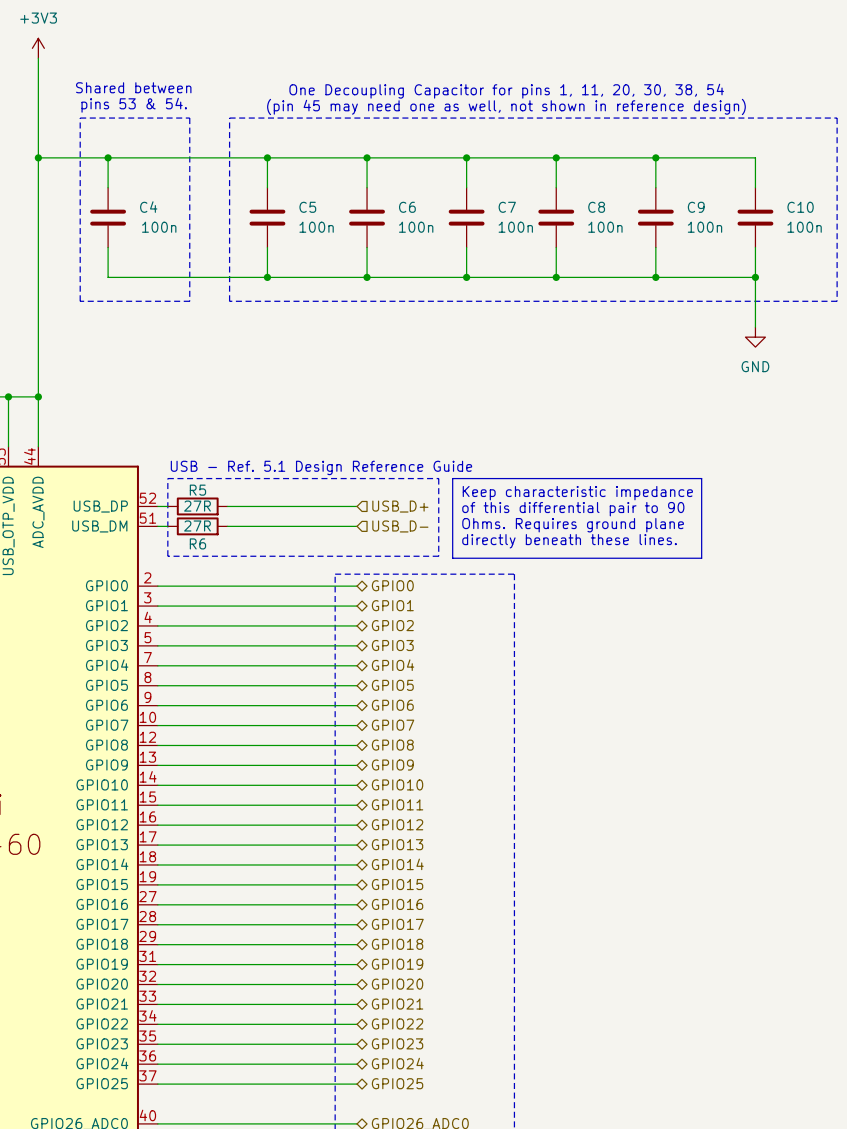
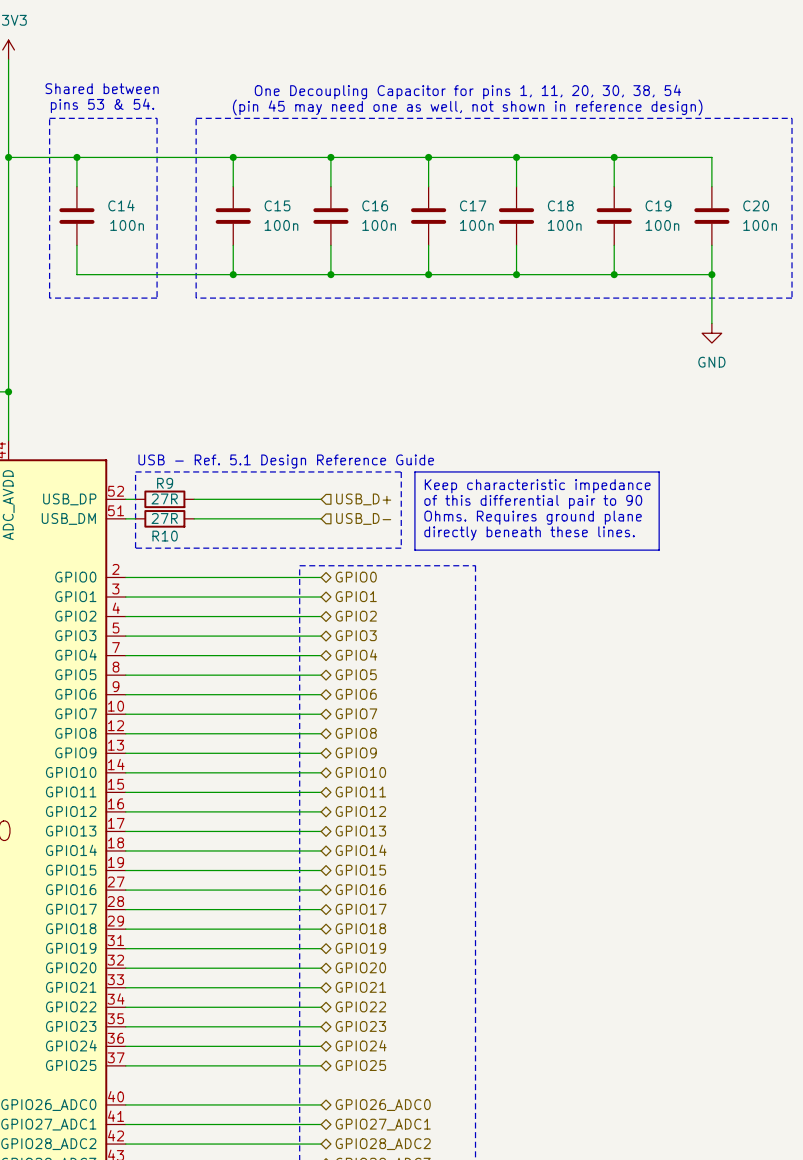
C4 name: C4 (148, 207) -> C14 (121, 205)
C5 name: C5 (307, 207) -> C15 (277, 205)
C6 name: C6 (407, 207) -> C16 (375, 205)
C7 name: C7 (507, 207) -> C17 (473, 205)
C8 name: C8 (596, 207) -> C18 (560, 205)
C9 name: C9 (696, 207) -> C19 (658, 205)
C10 name: C10 (800, 207) -> C20 (756, 205)
R5 name: R5 (197, 490) -> R9 (165, 483)
R6 name: R6 (197, 543) -> R10 (165, 536)

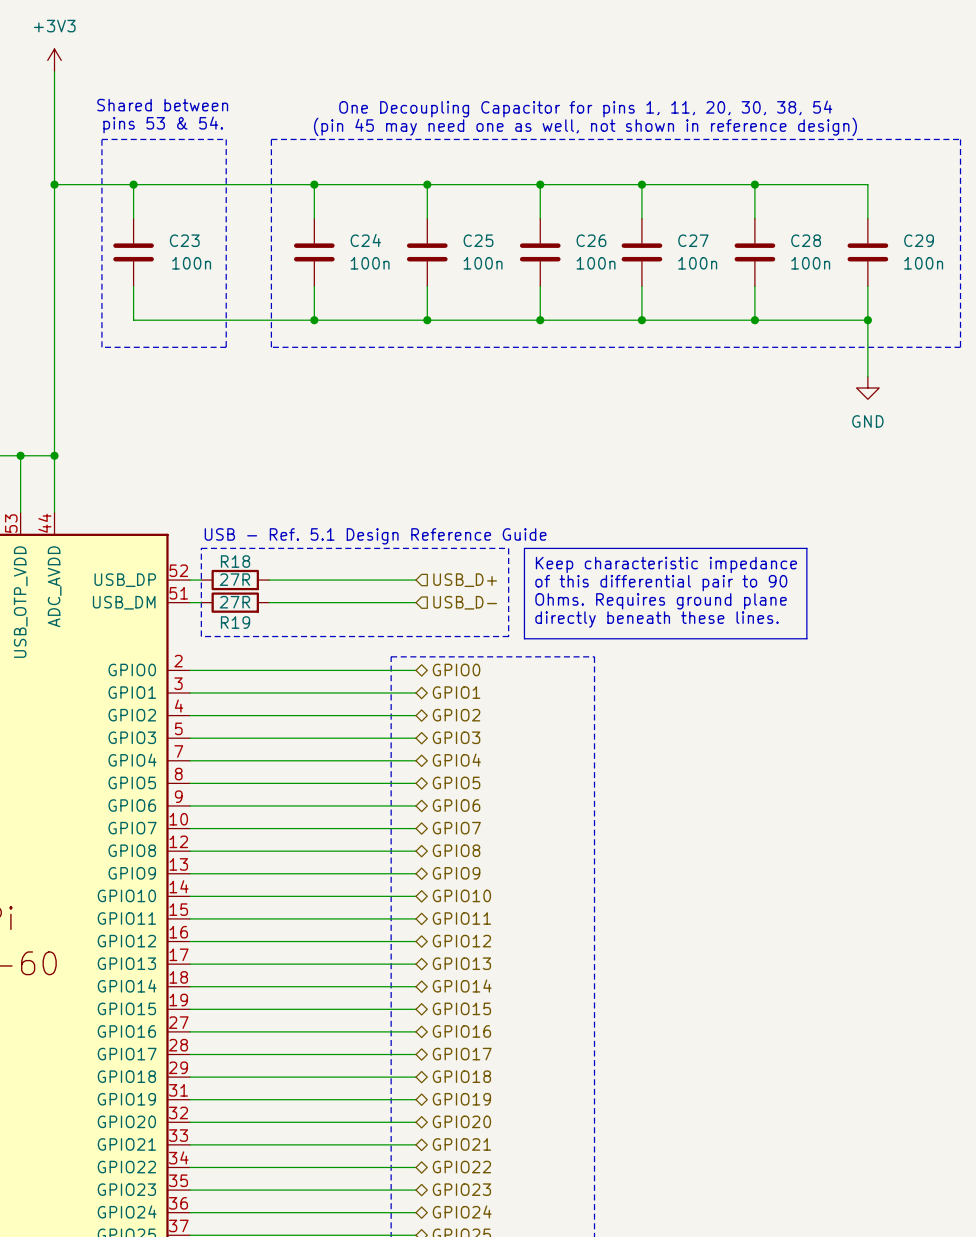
C14 name: C14 (121, 205) -> C23 (184, 240)
C15 name: C15 (277, 205) -> C24 (365, 240)
C16 name: C16 (375, 205) -> C25 (478, 240)
C17 name: C17 (473, 205) -> C26 (591, 240)
C18 name: C18 (560, 205) -> C27 (693, 240)
C19 name: C19 (658, 205) -> C28 (806, 240)
C20 name: C20 (756, 205) -> C29 (919, 240)
R9 name: R9 (165, 483) -> R18 (235, 561)
R10 name: R10 (165, 536) -> R19 (235, 622)

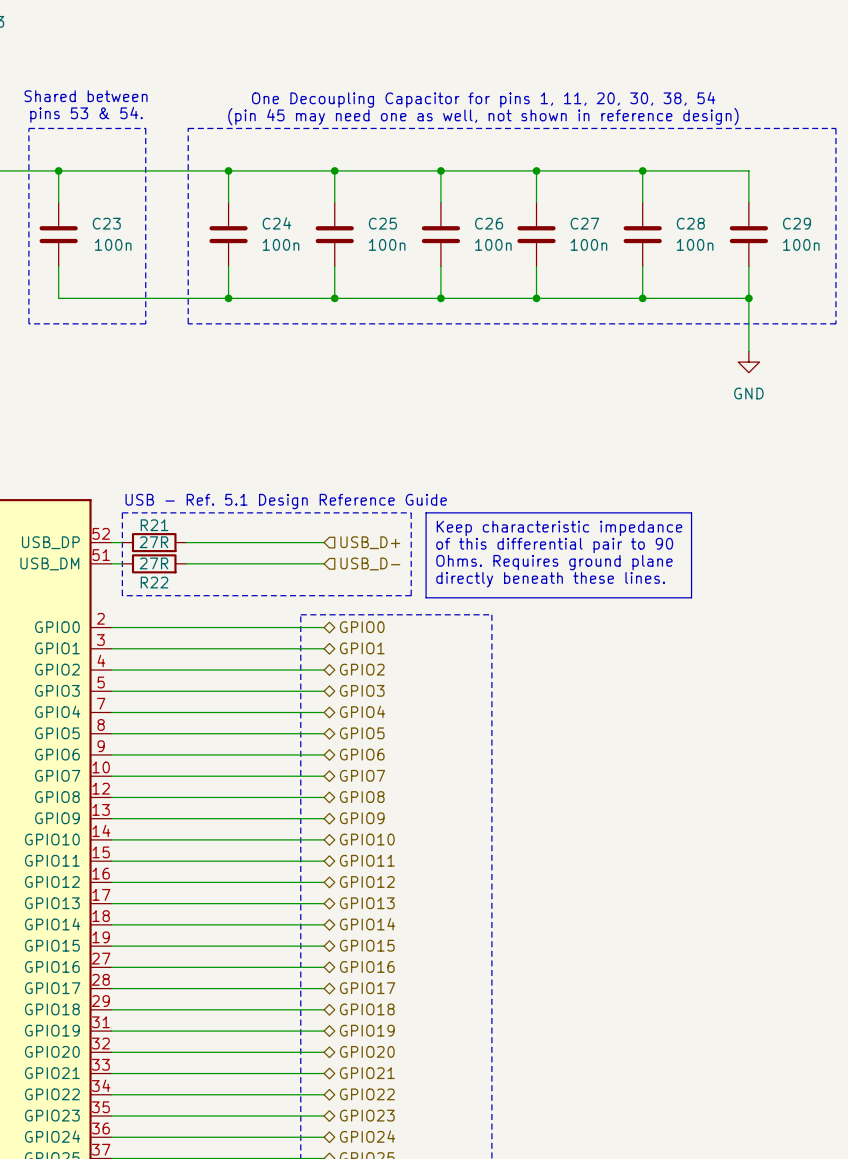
R18 name: R18 (235, 561) -> R21 (154, 525)
R19 name: R19 (235, 622) -> R22 (154, 582)

